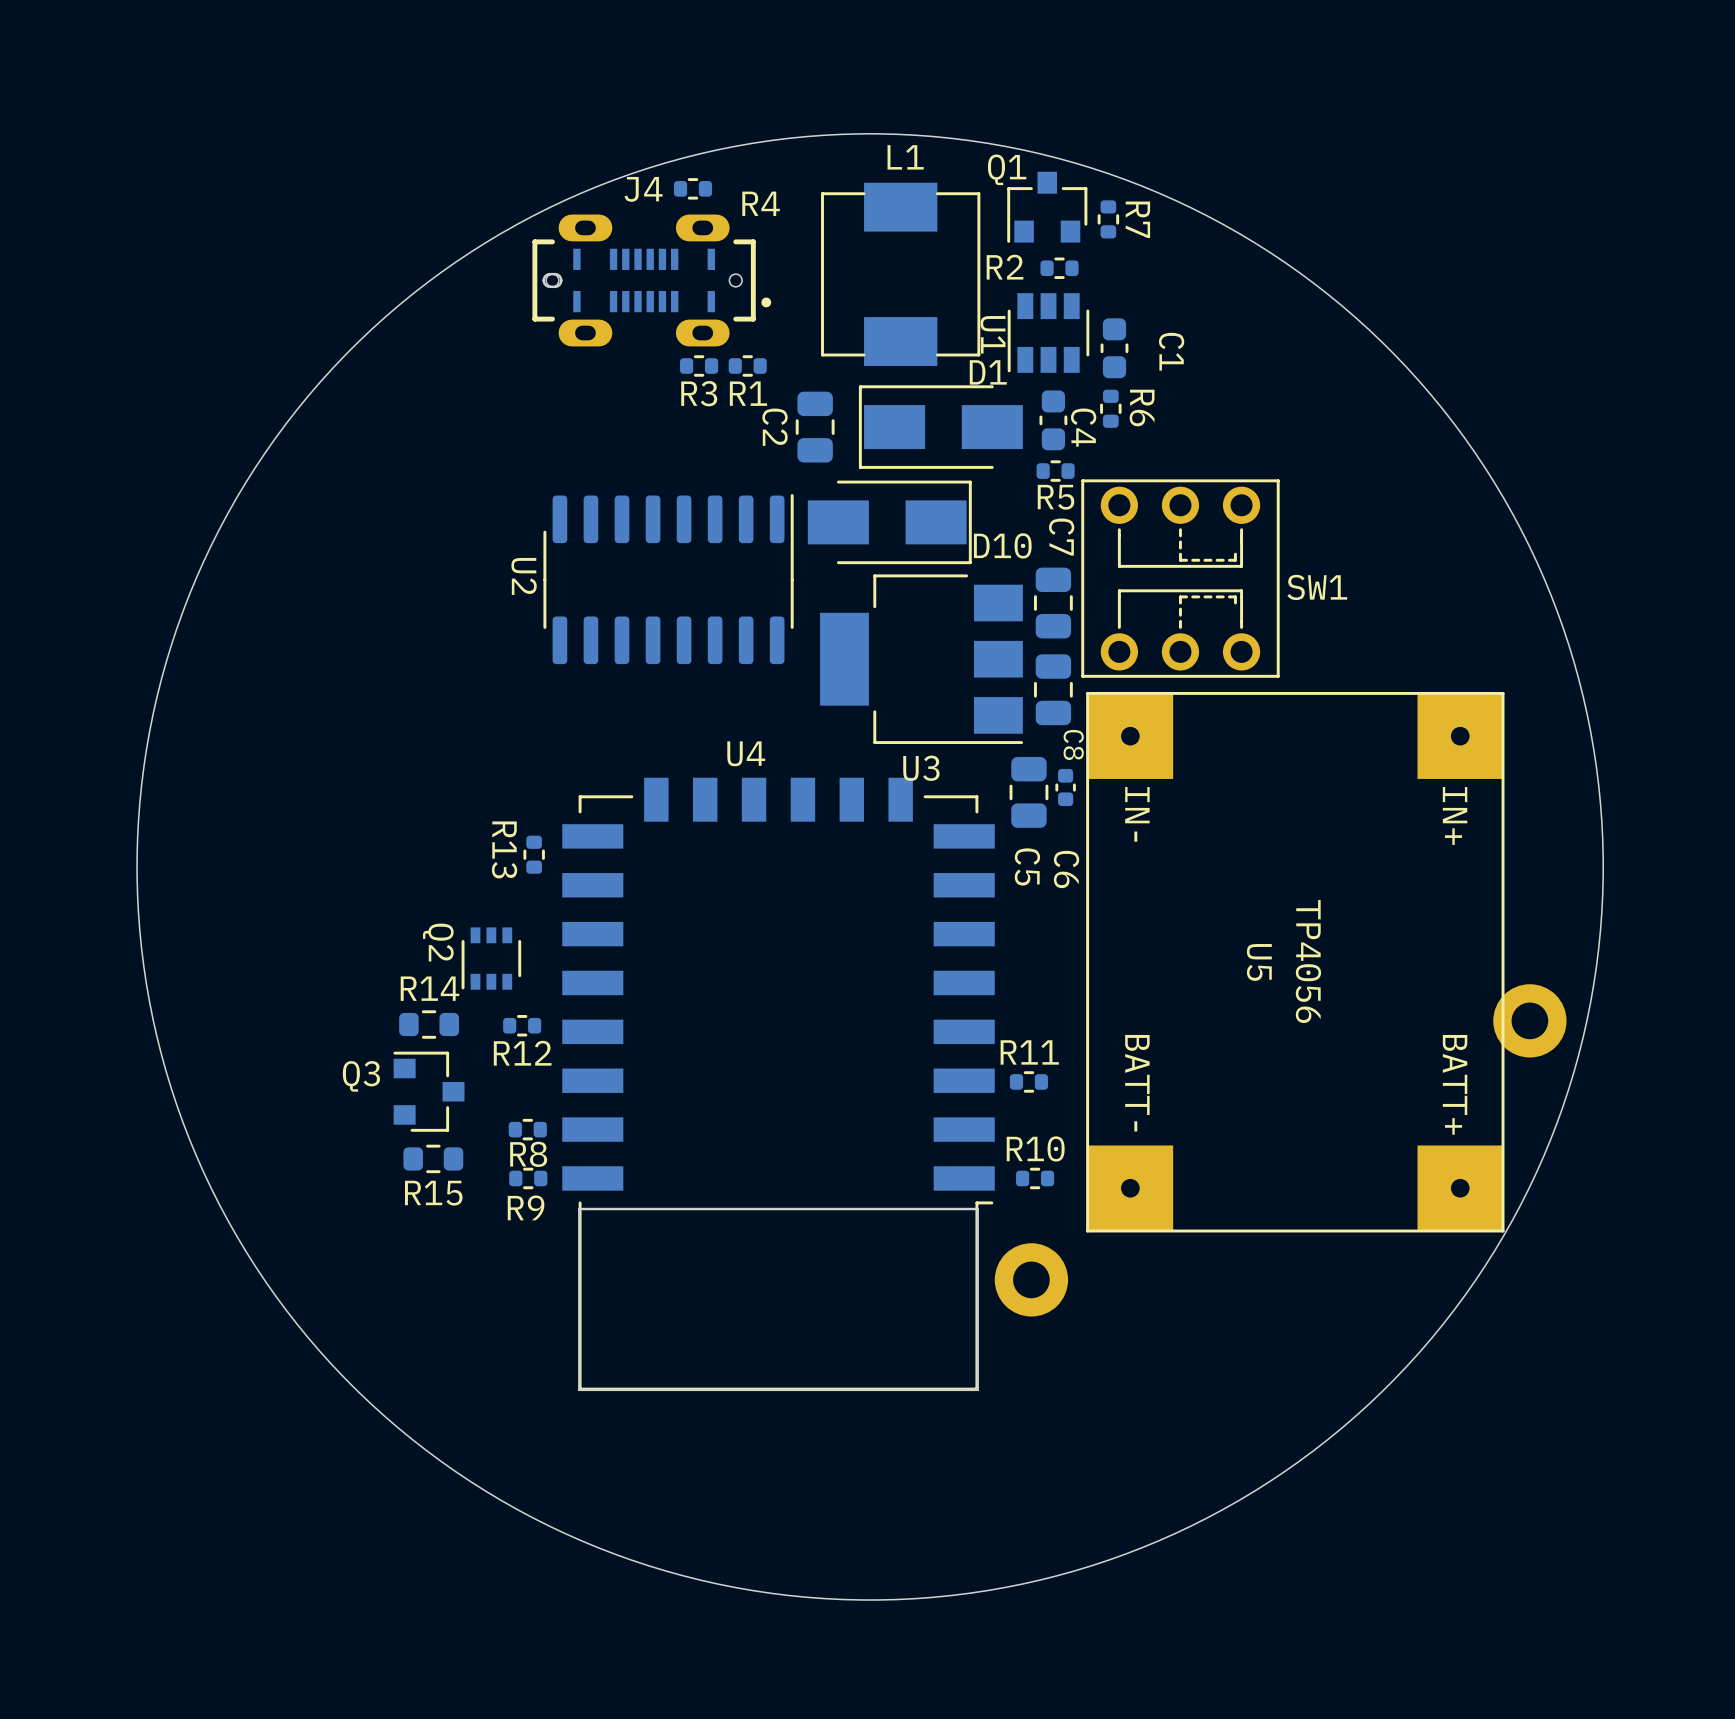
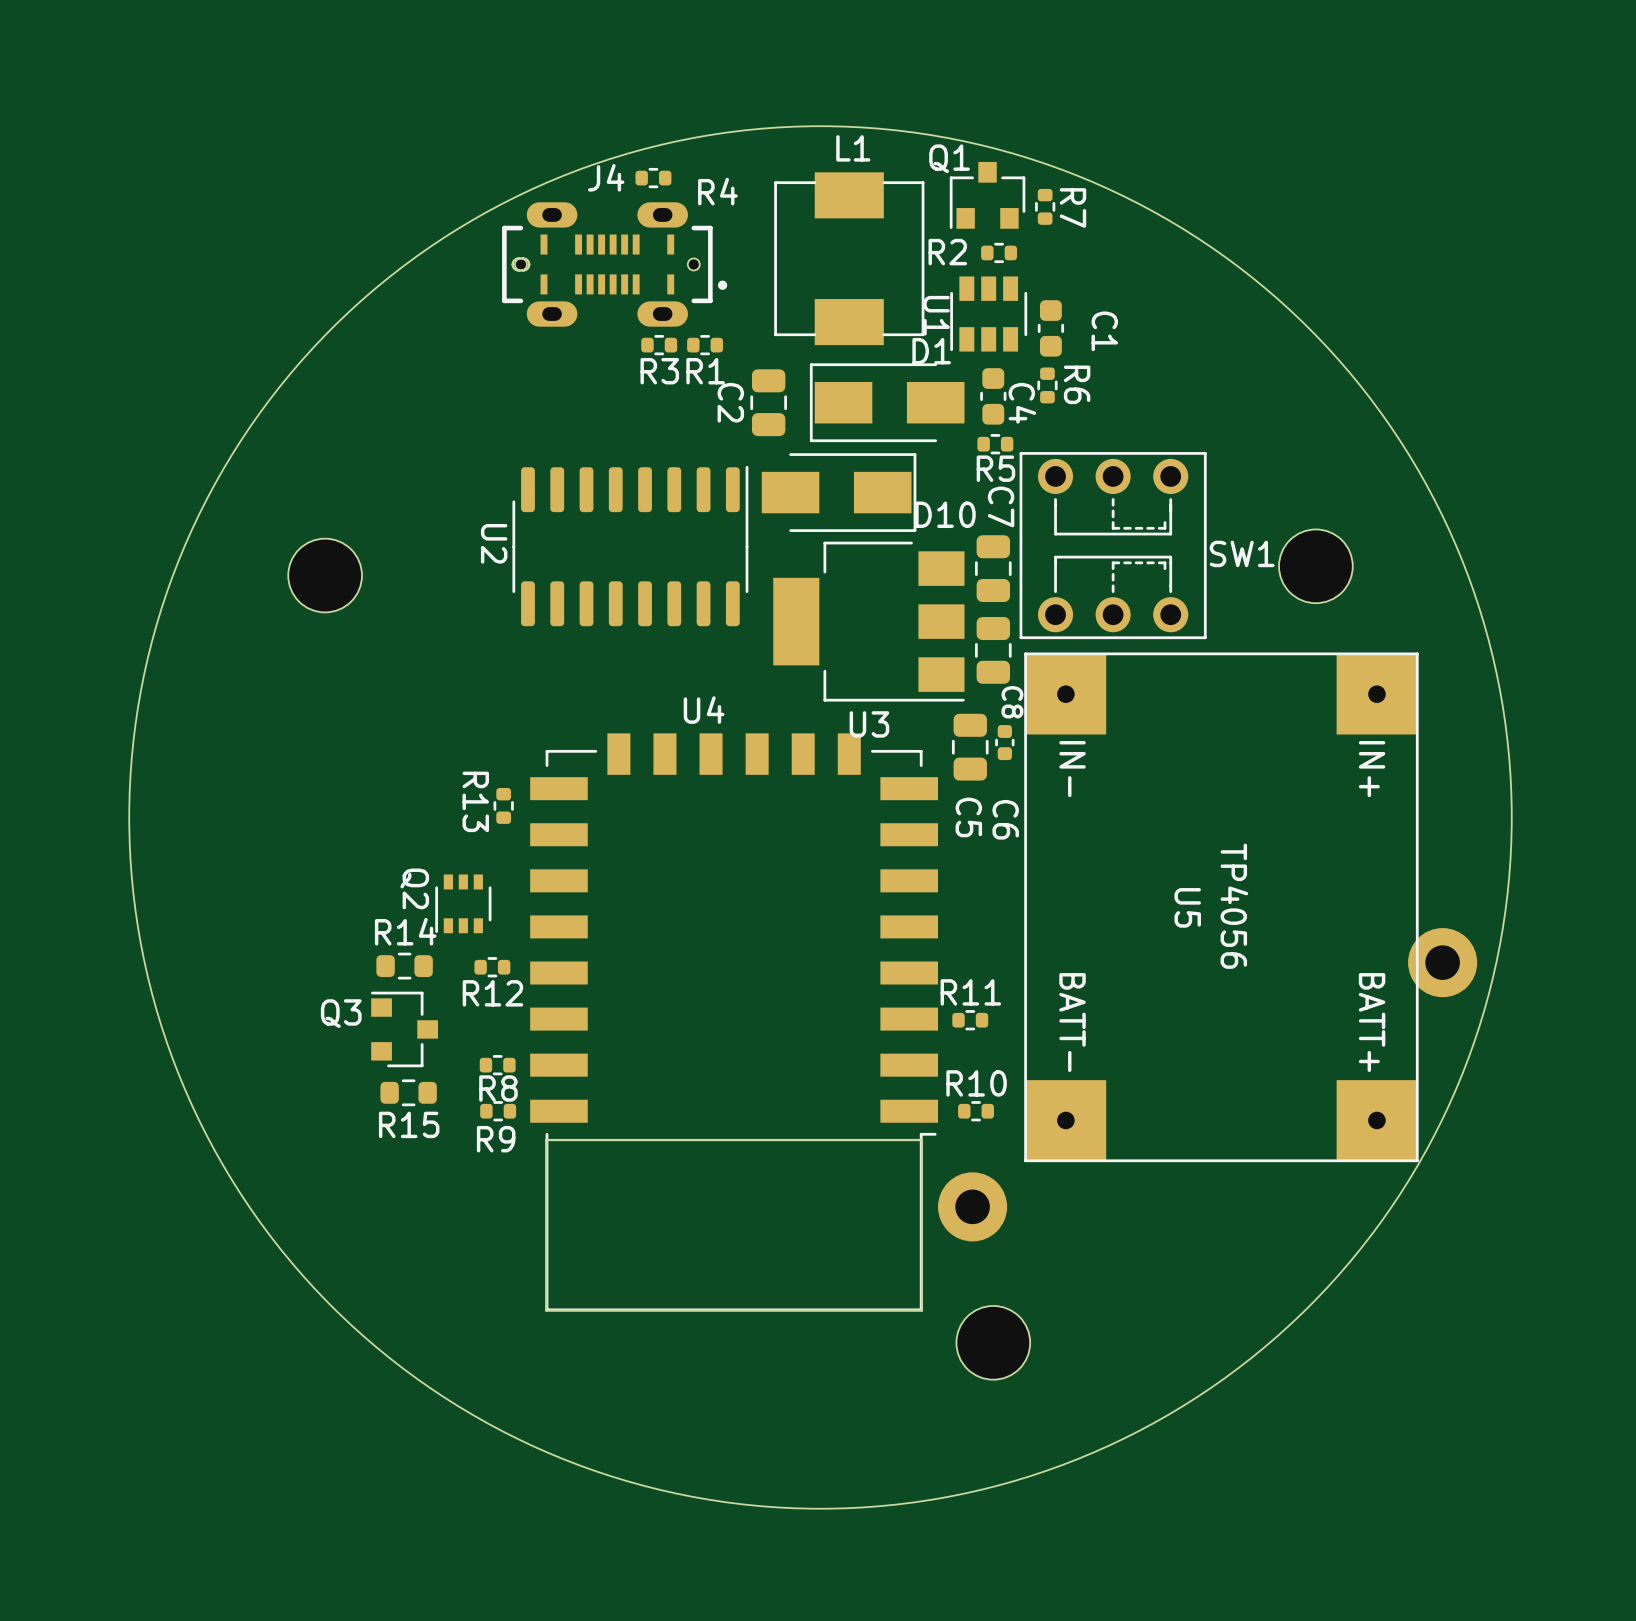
part: none -> (1315, 566)
part: none -> (325, 575)
part: none -> (993, 1342)

